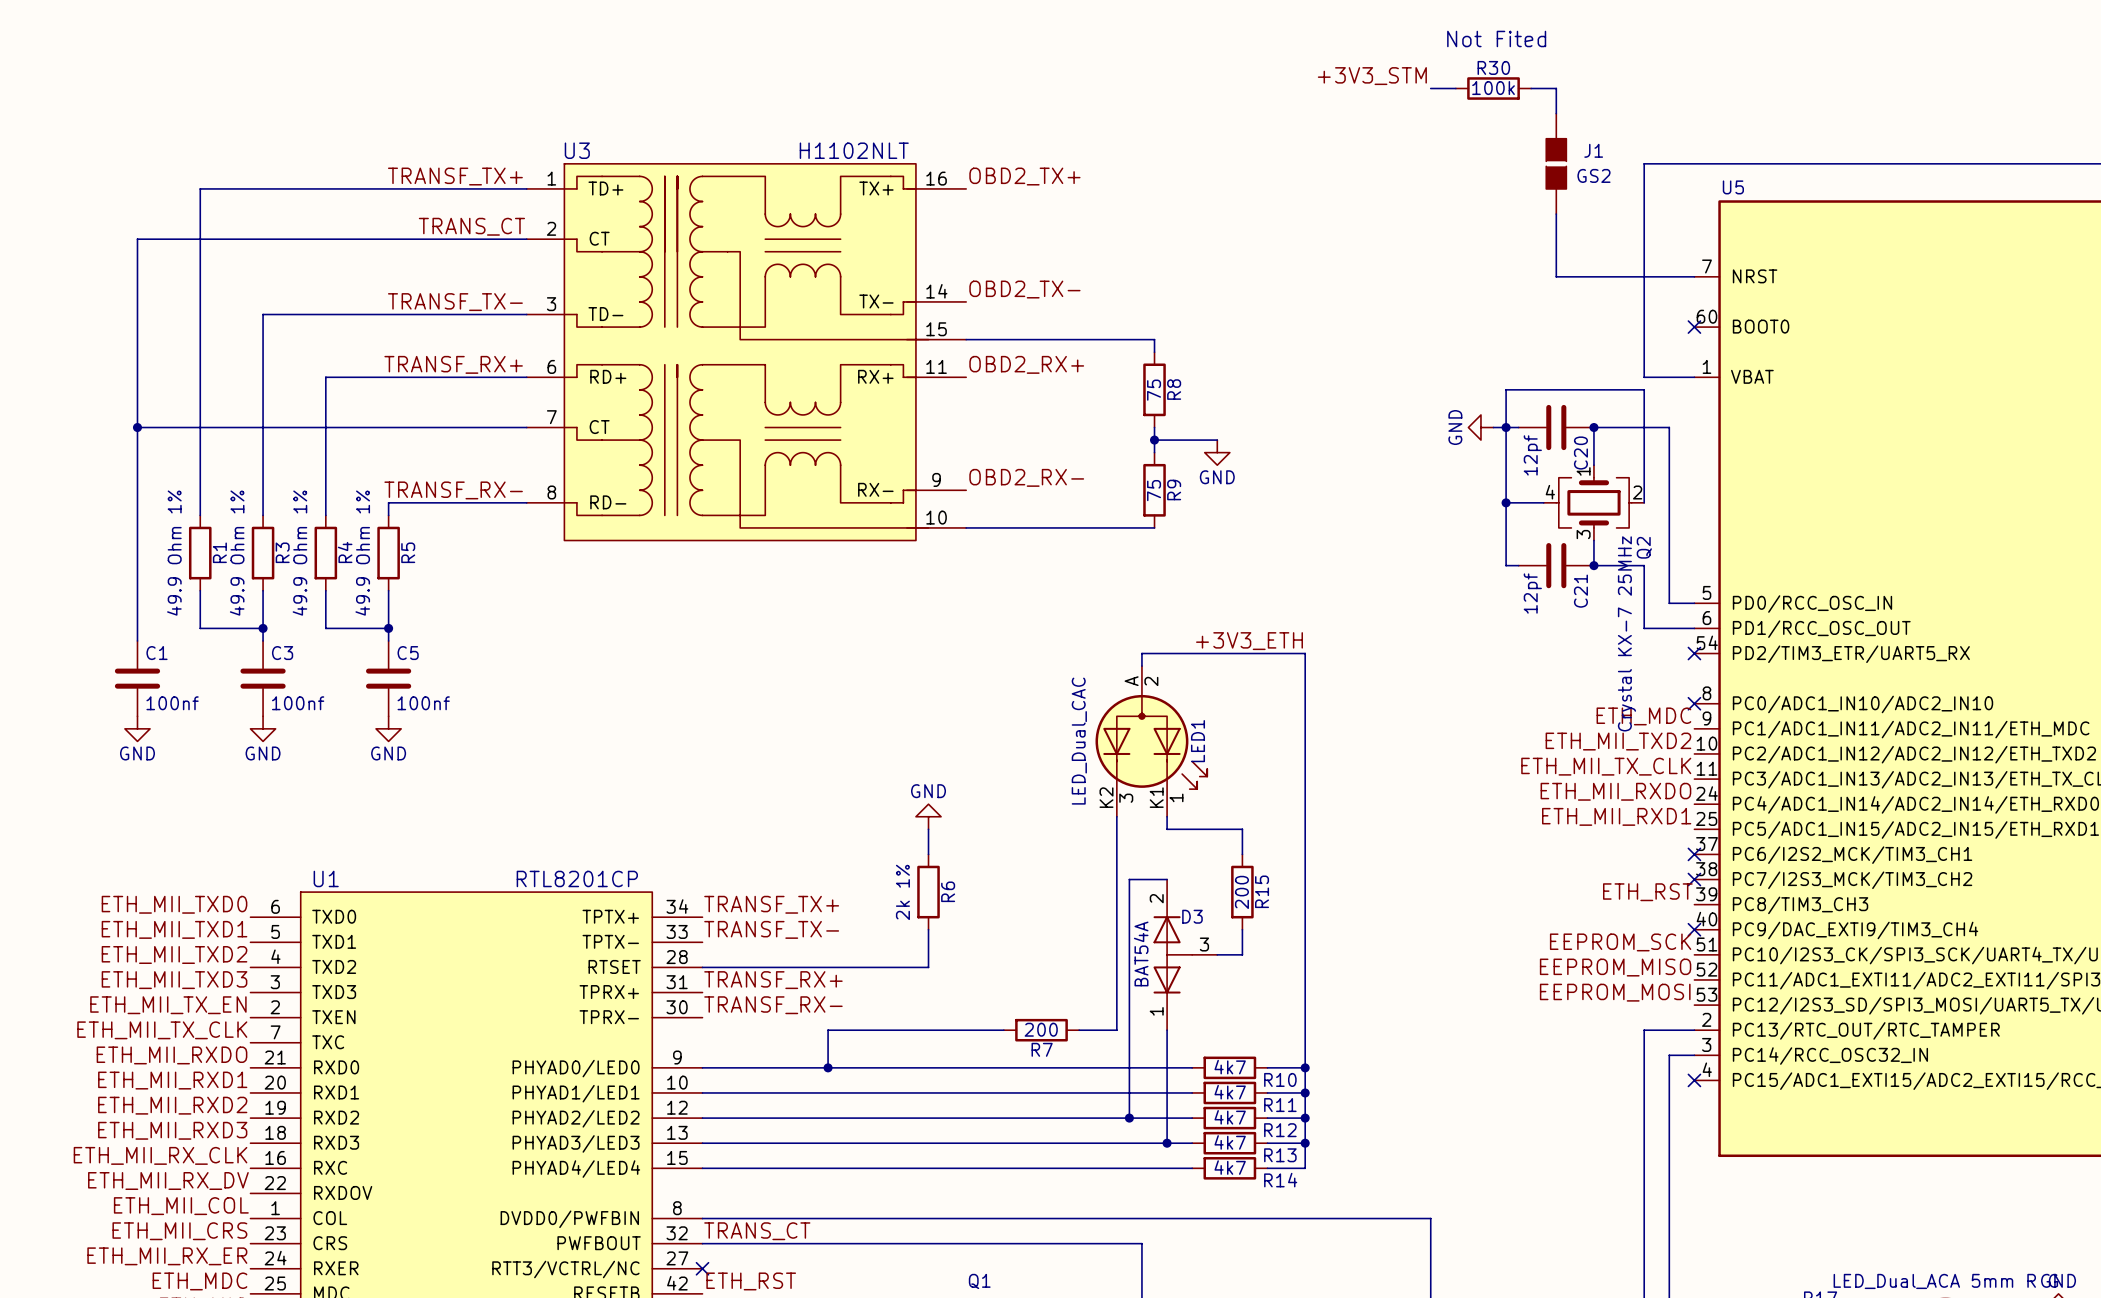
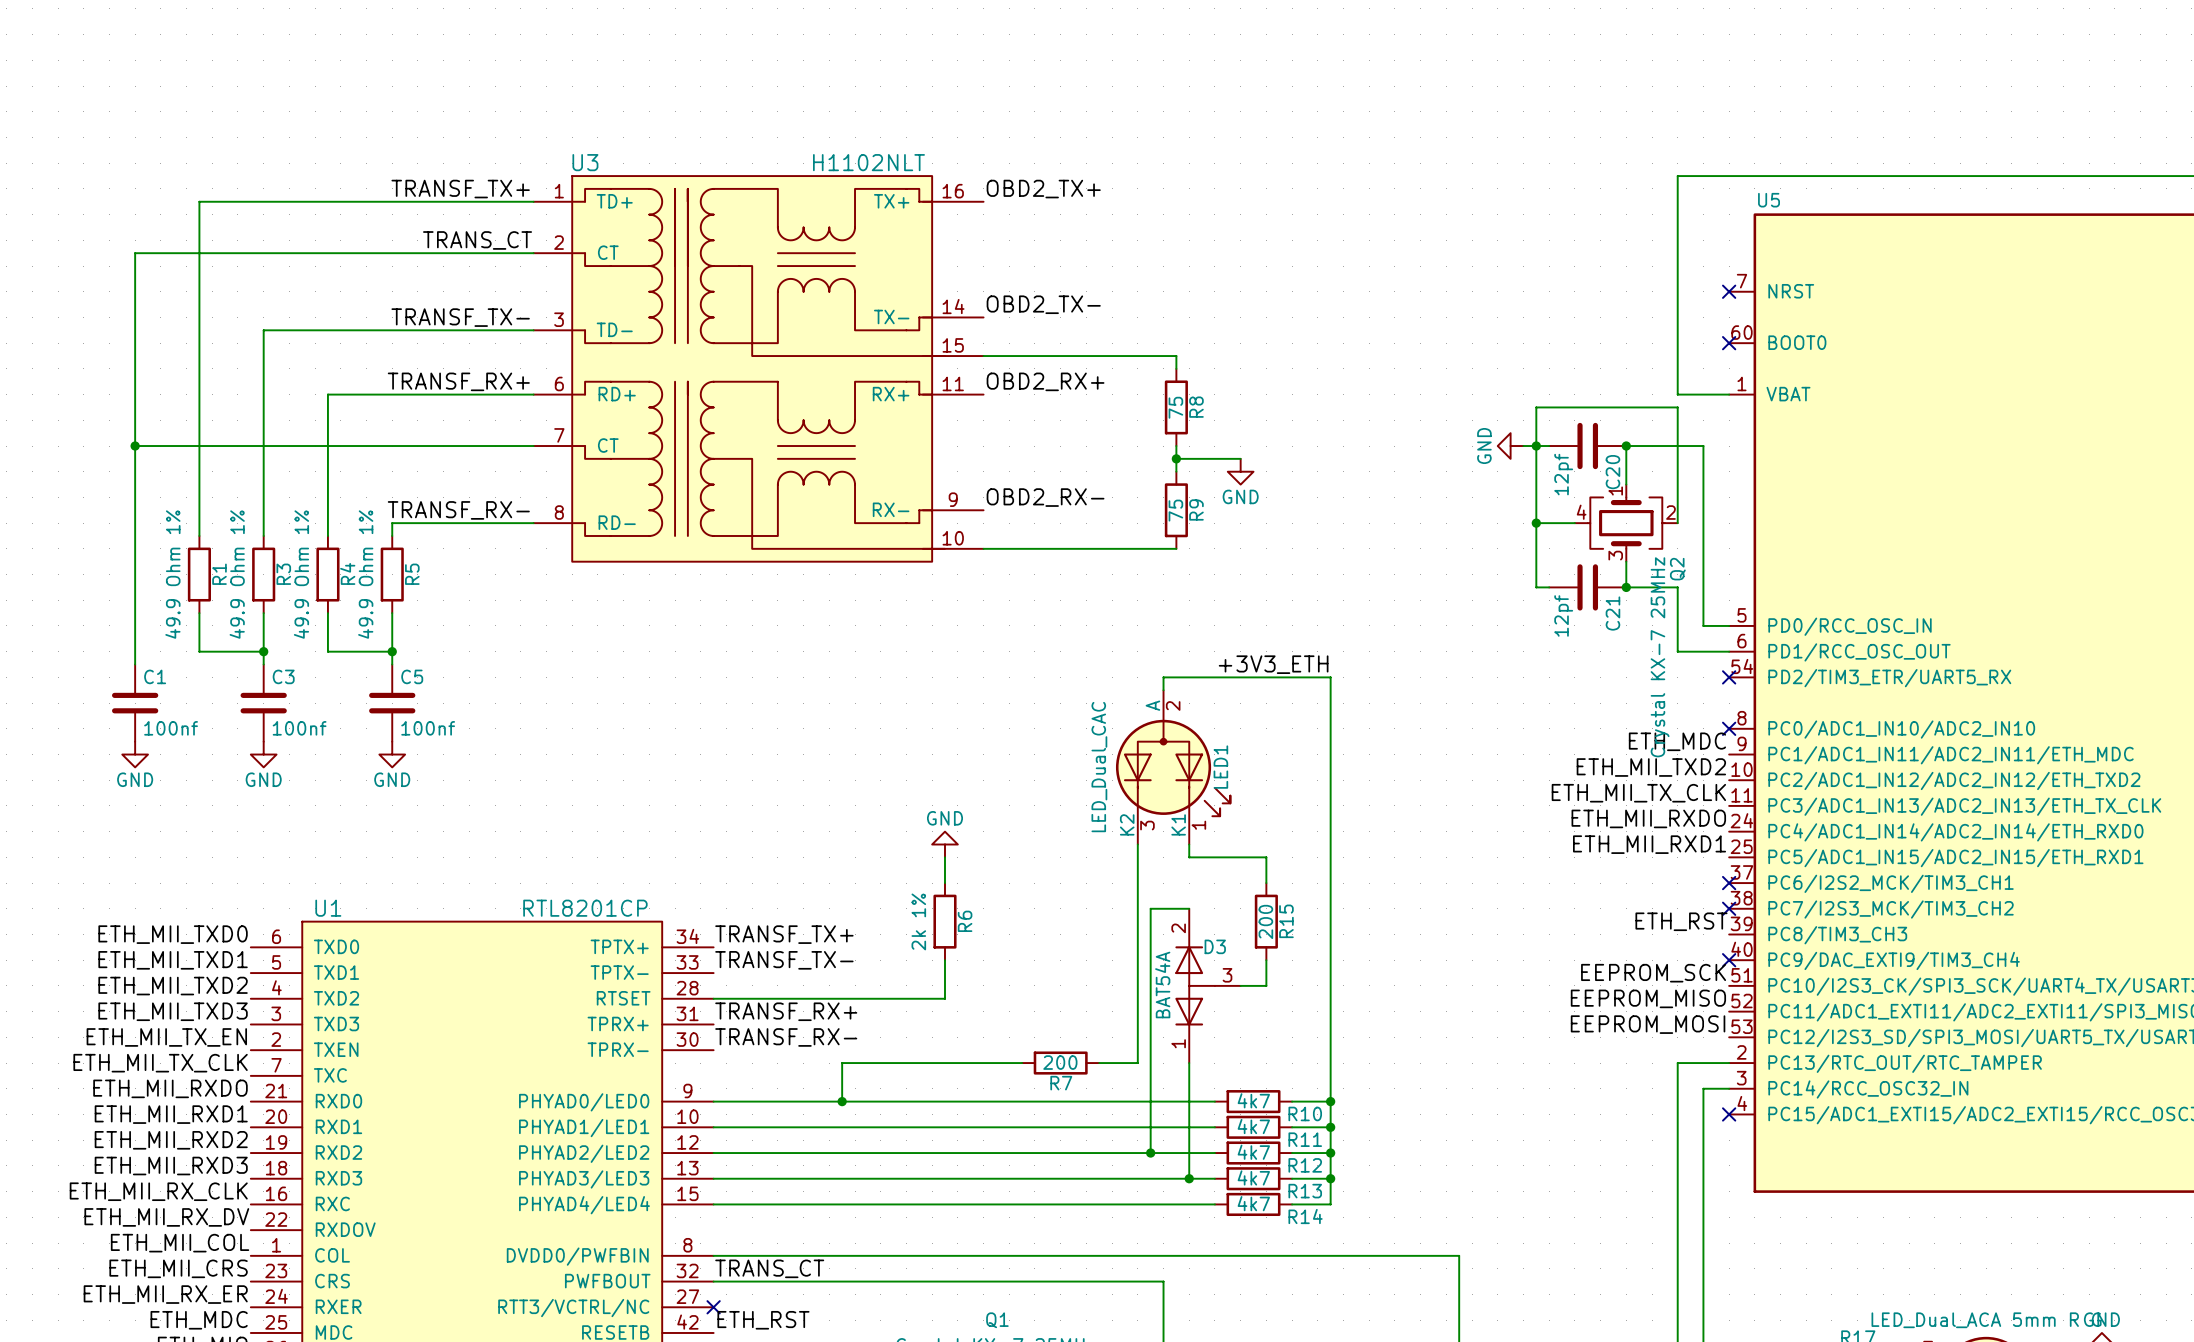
text: Not Fited (1496, 38) -> none
label: +3V3_STM (1372, 76) -> none
wire: (1430, 88) (1455, 88) -> none
R30: 100k (1493, 88) -> none
wire: (1531, 88) (1556, 88) (1556, 113) -> none
J1: GS2 (1556, 163) -> none
wire: (1556, 214) (1556, 276) (1694, 276) -> none
no-connect mark: none -> (1729, 291)

